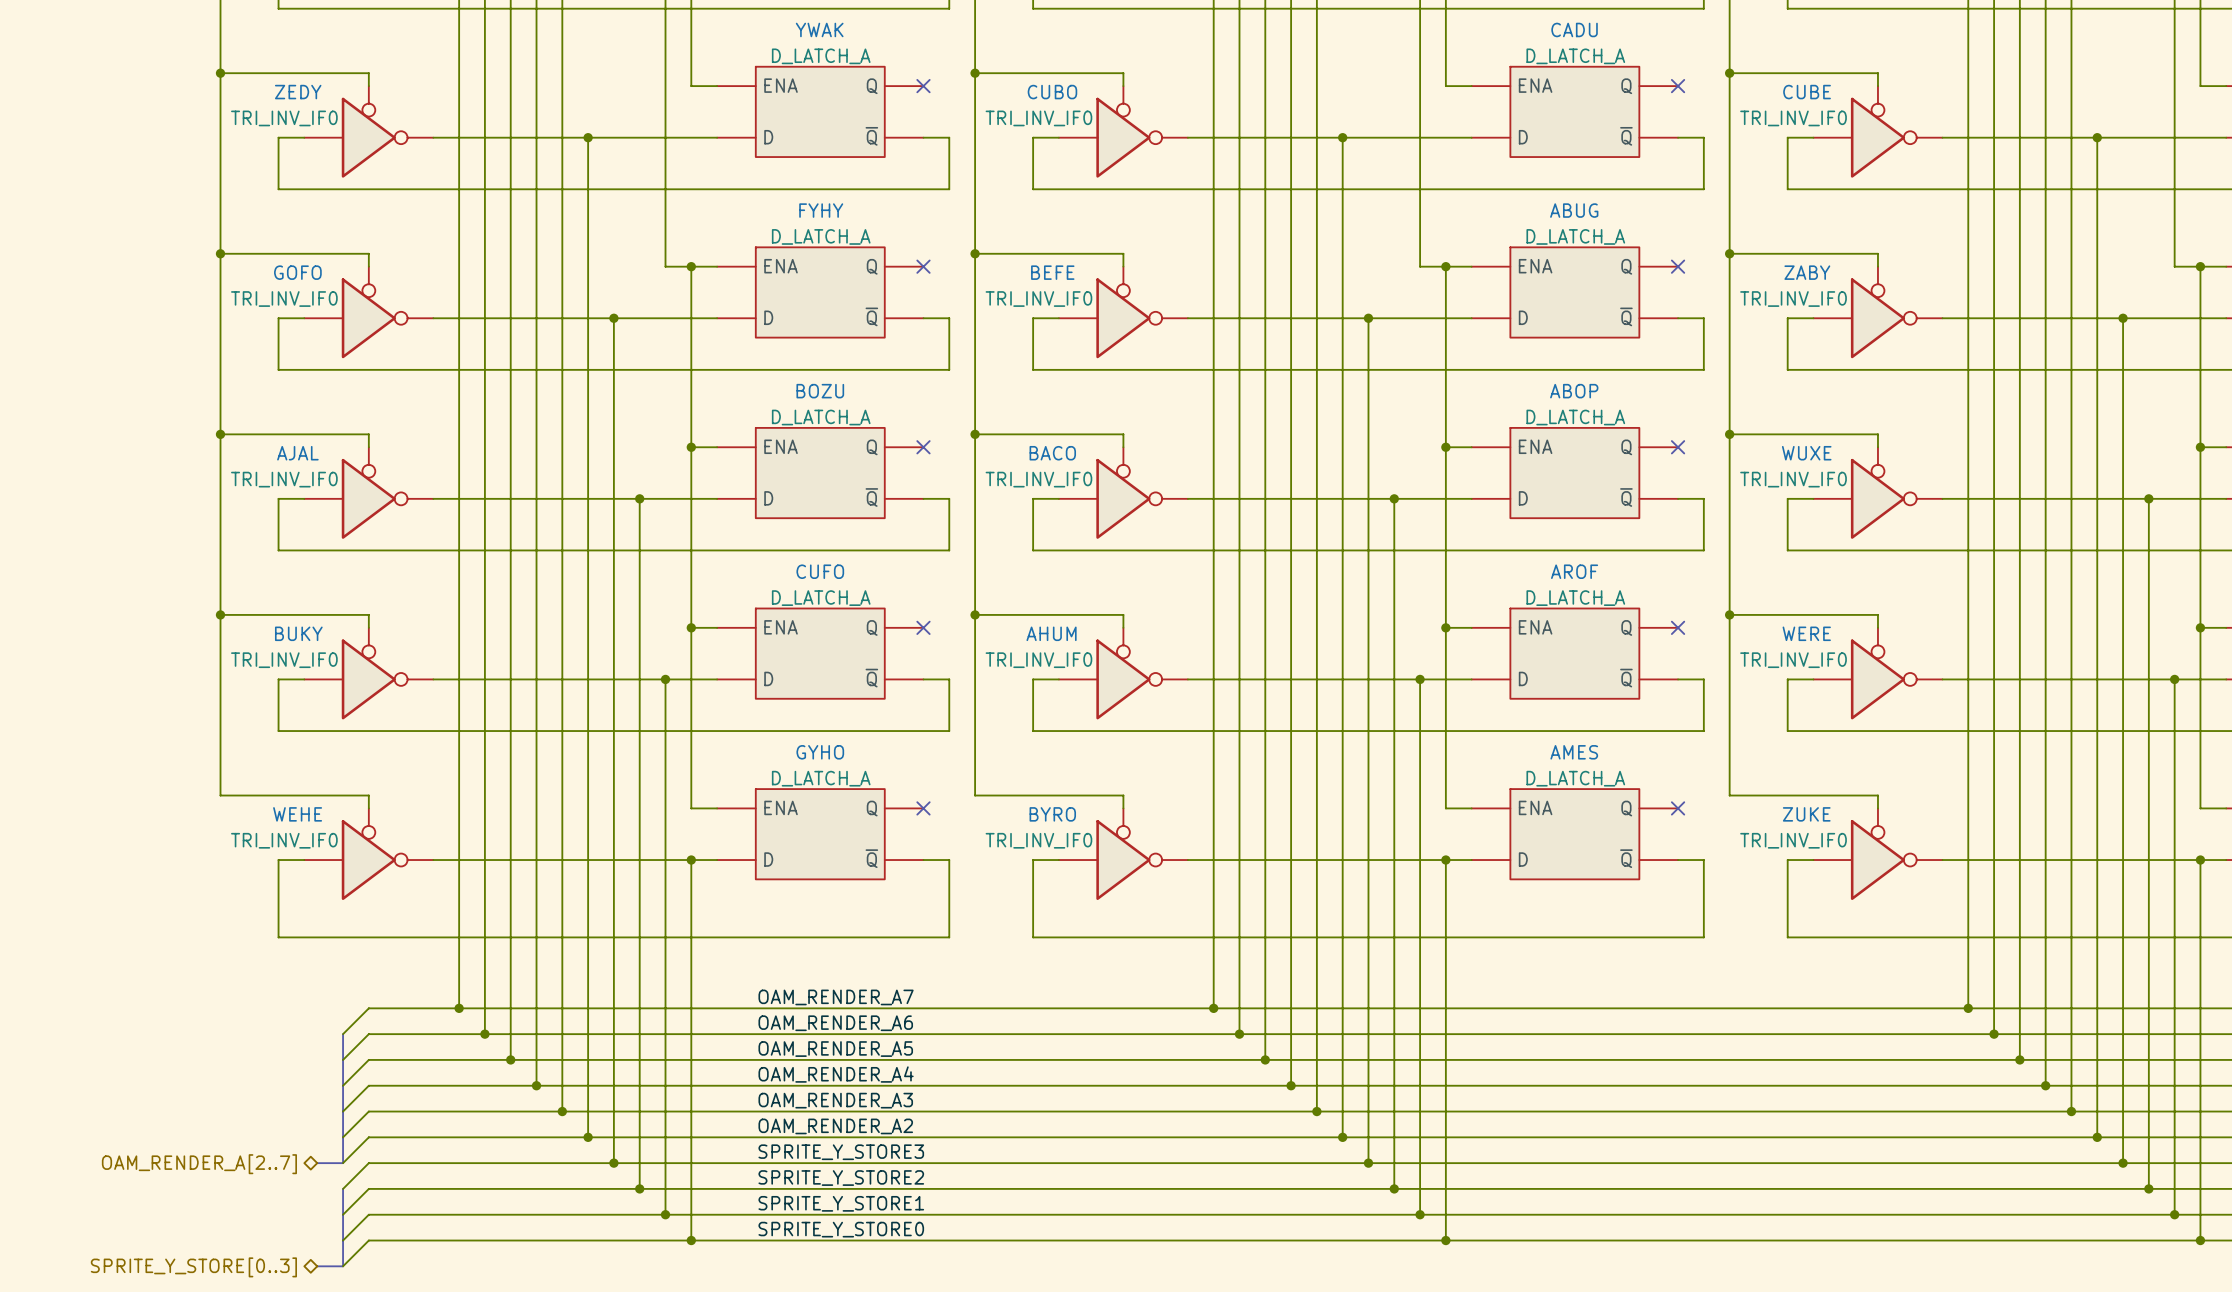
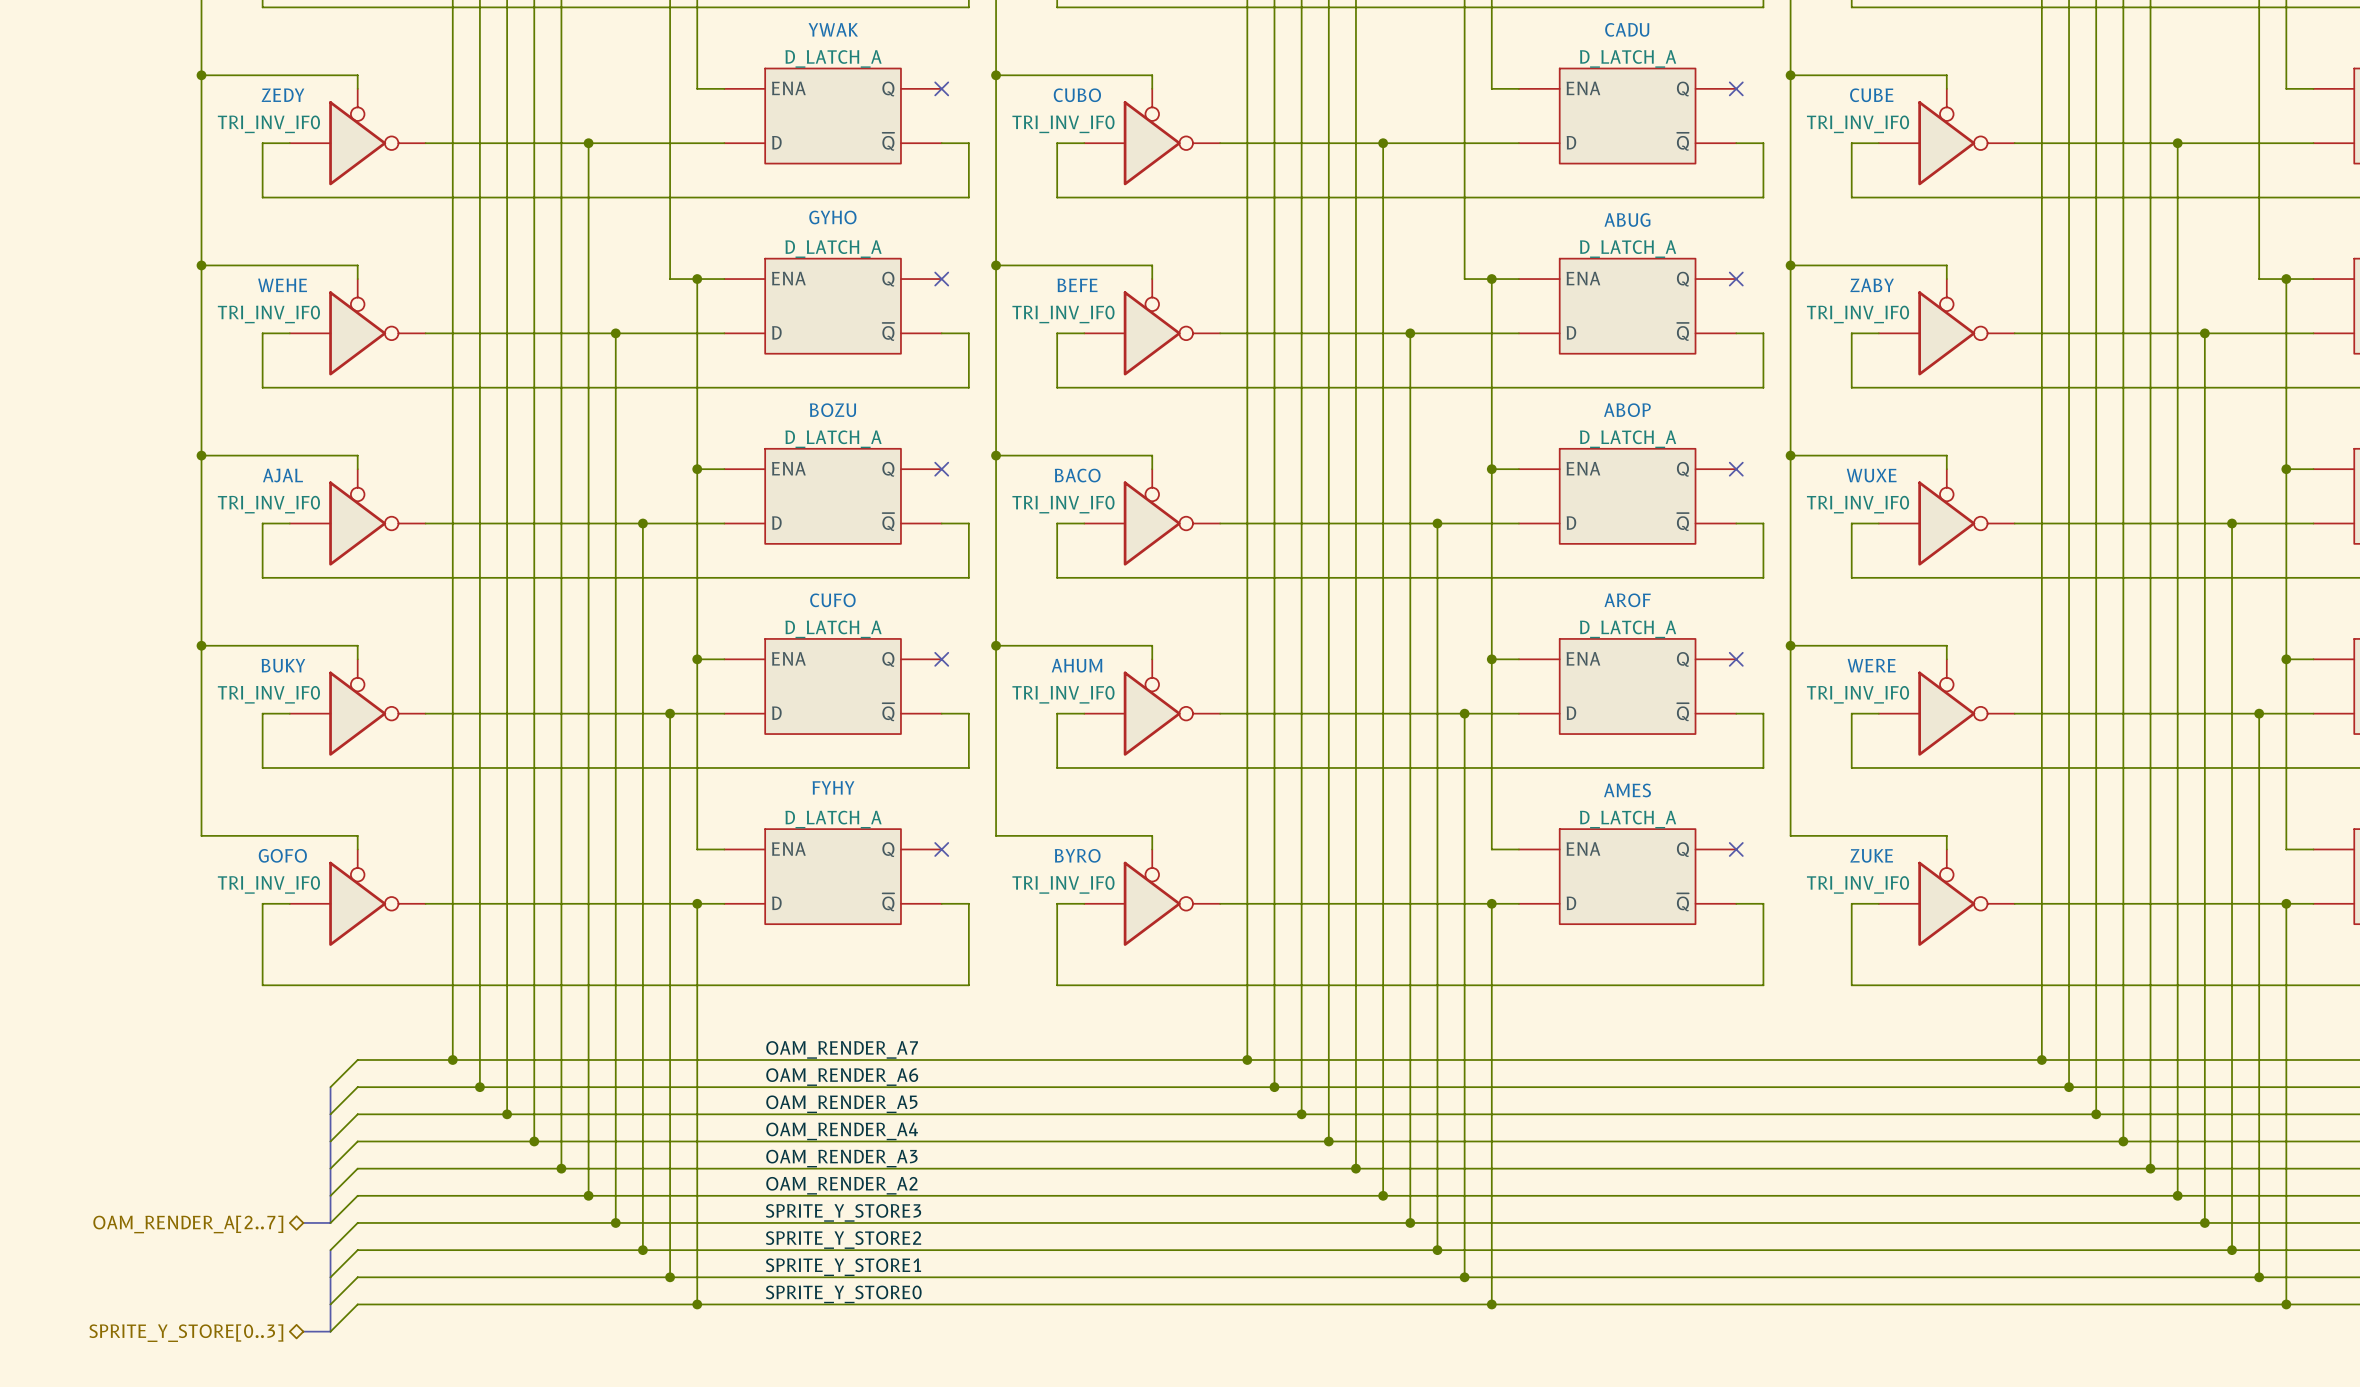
FYHY name: FYHY (821, 210) -> GYHO (832, 217)
GOFO name: GOFO (297, 272) -> WEHE (282, 285)
GYHO name: GYHO (820, 752) -> FYHY (833, 787)
WEHE name: WEHE (297, 814) -> GOFO (282, 855)

